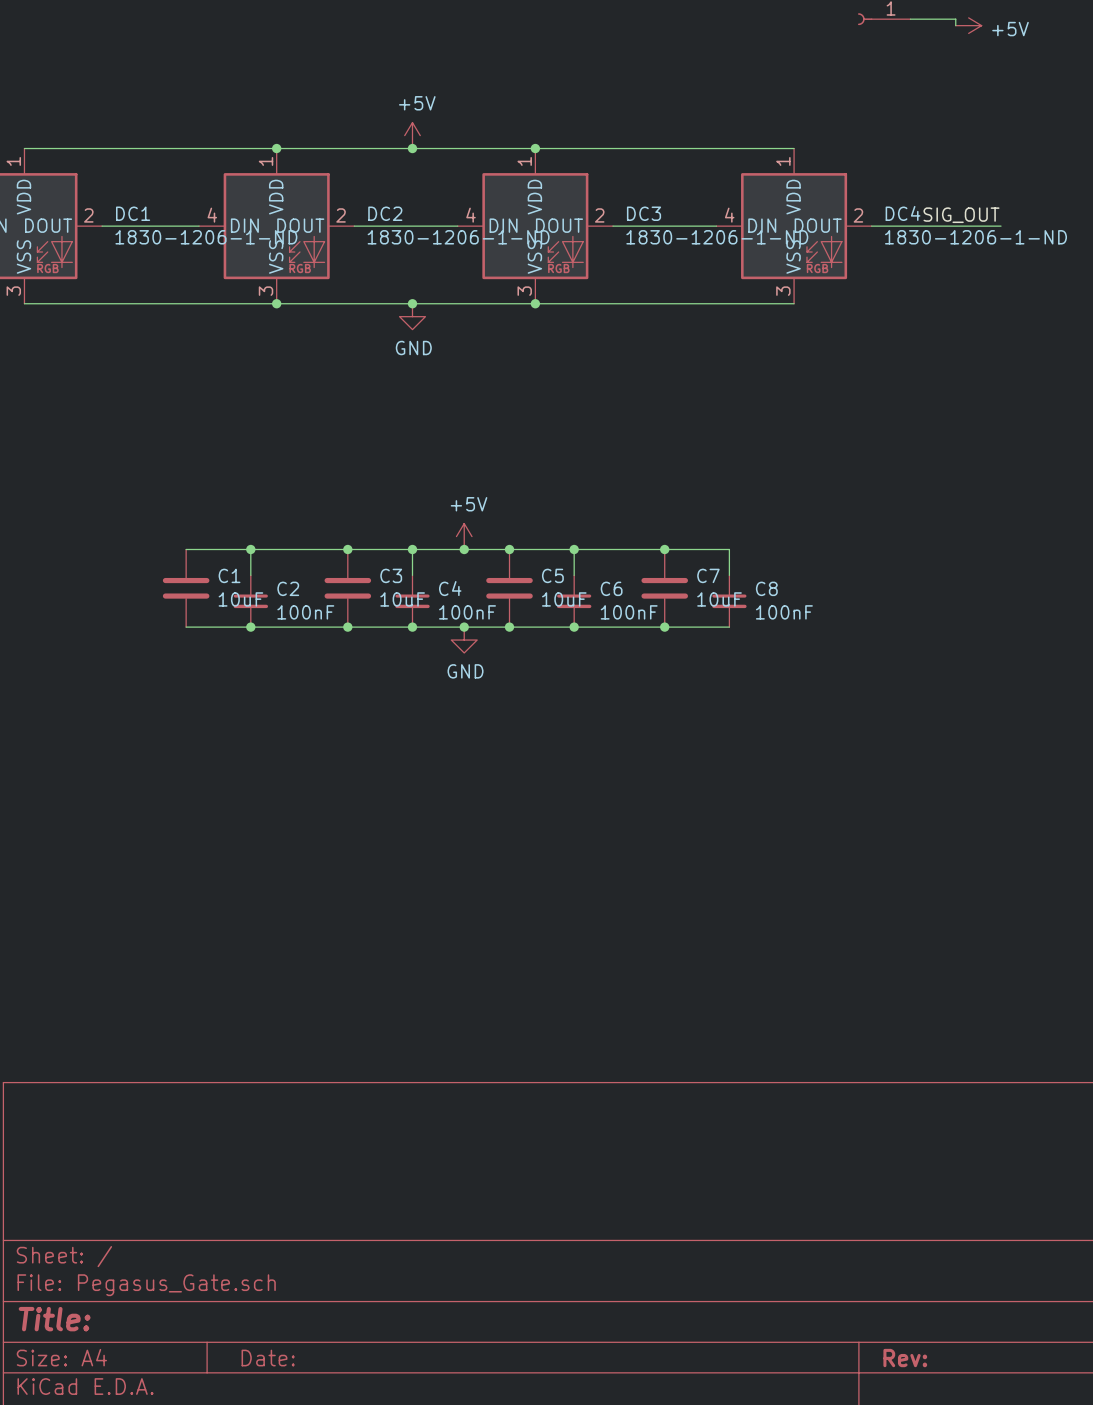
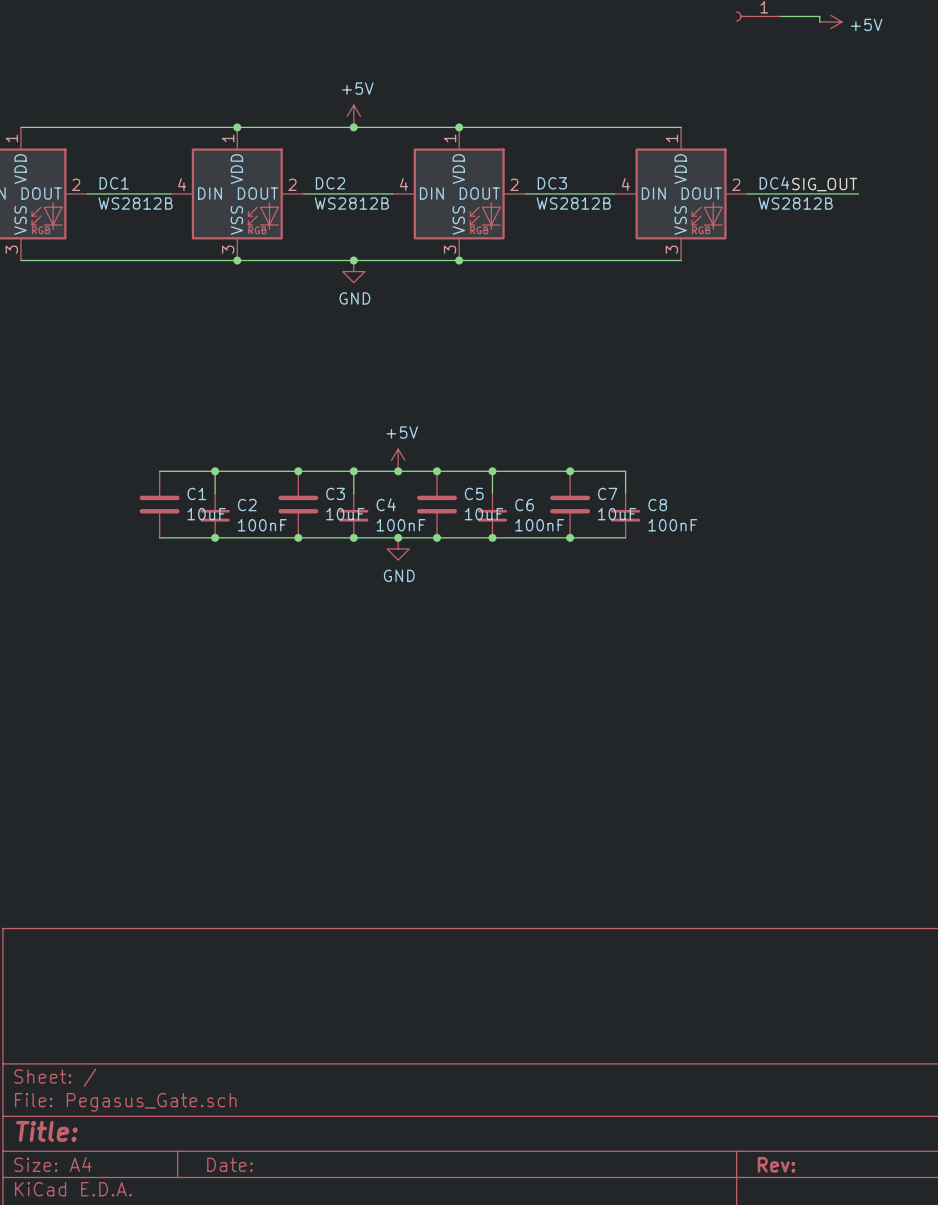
DC1 value: 1830-1206-1-ND (206, 237) -> WS2812B (135, 203)
DC2 value: 1830-1206-1-ND (458, 237) -> WS2812B (351, 203)
DC3 value: 1830-1206-1-ND (717, 237) -> WS2812B (573, 203)
DC4 value: 1830-1206-1-ND (976, 237) -> WS2812B (795, 203)

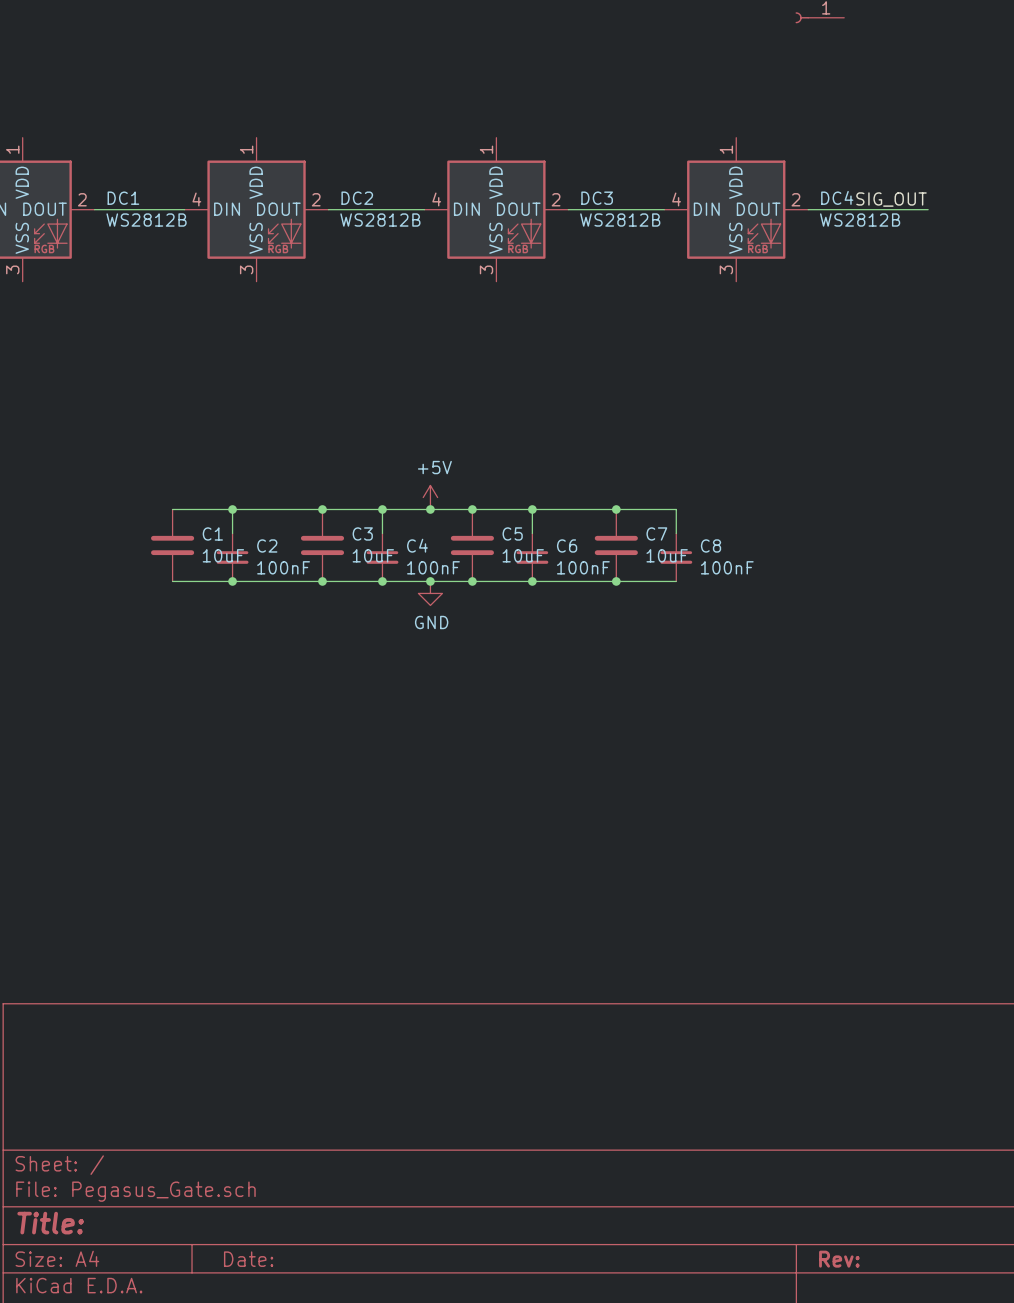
wire: (780, 16) (819, 16) (819, 21) -> none
power symbol: +5V (830, 21) -> none
power symbol: +5V (353, 116) -> none
wire: (20, 127) (681, 127) -> none
junction: (237, 127) -> none
junction: (353, 127) -> none
junction: (459, 127) -> none
wire: (20, 260) (681, 260) -> none
junction: (237, 260) -> none
junction: (353, 260) -> none
junction: (459, 260) -> none
power symbol: GND (353, 271) -> none

